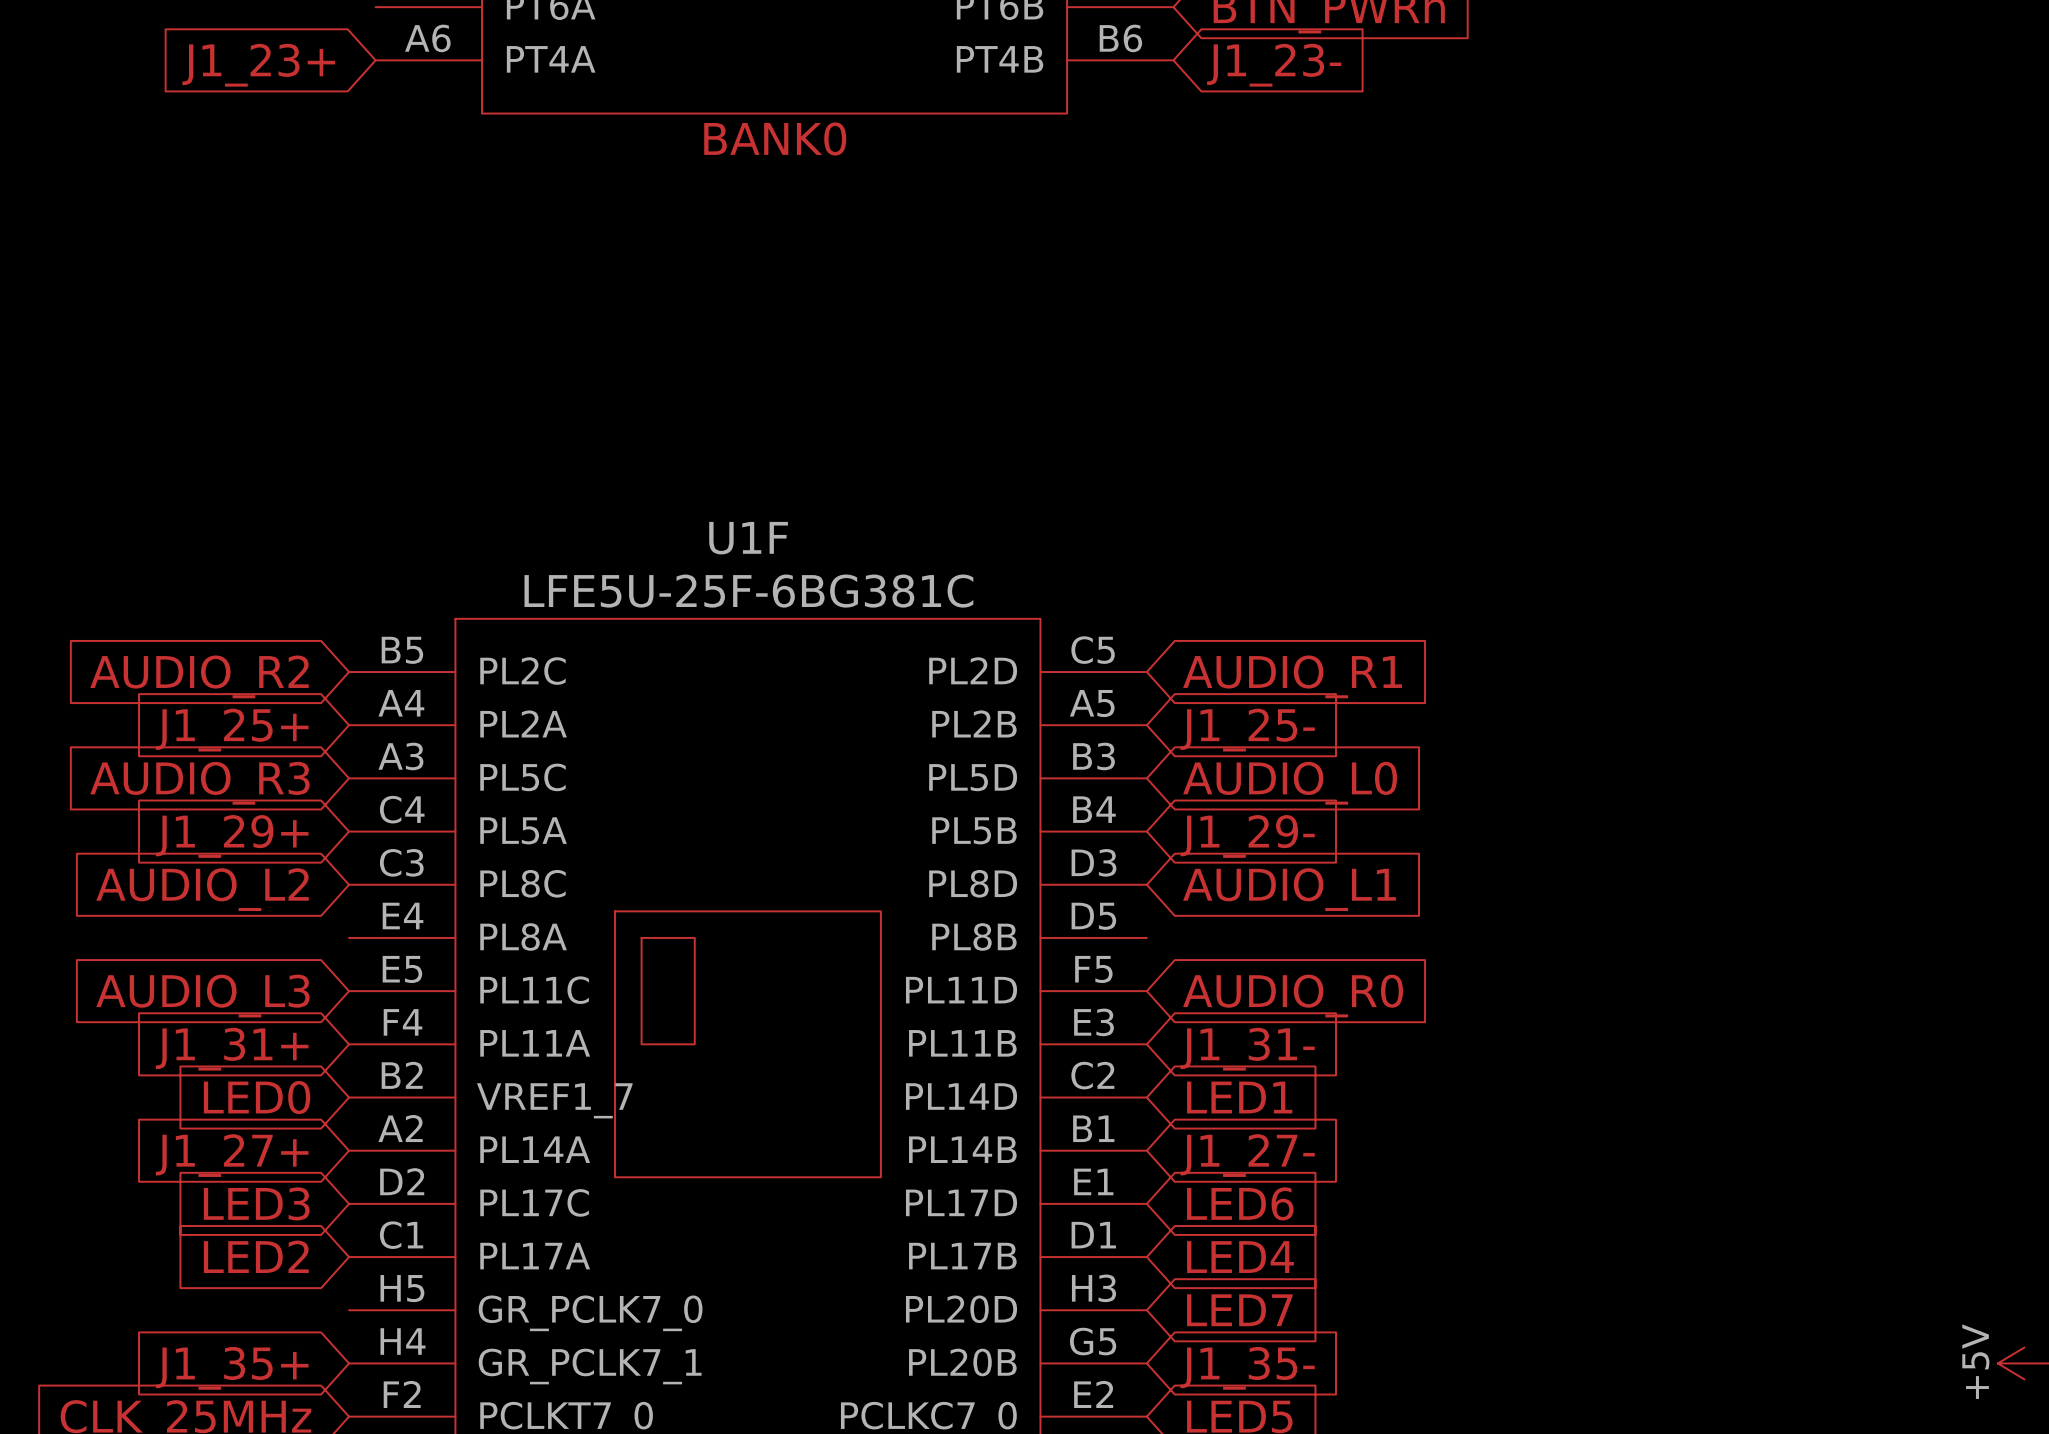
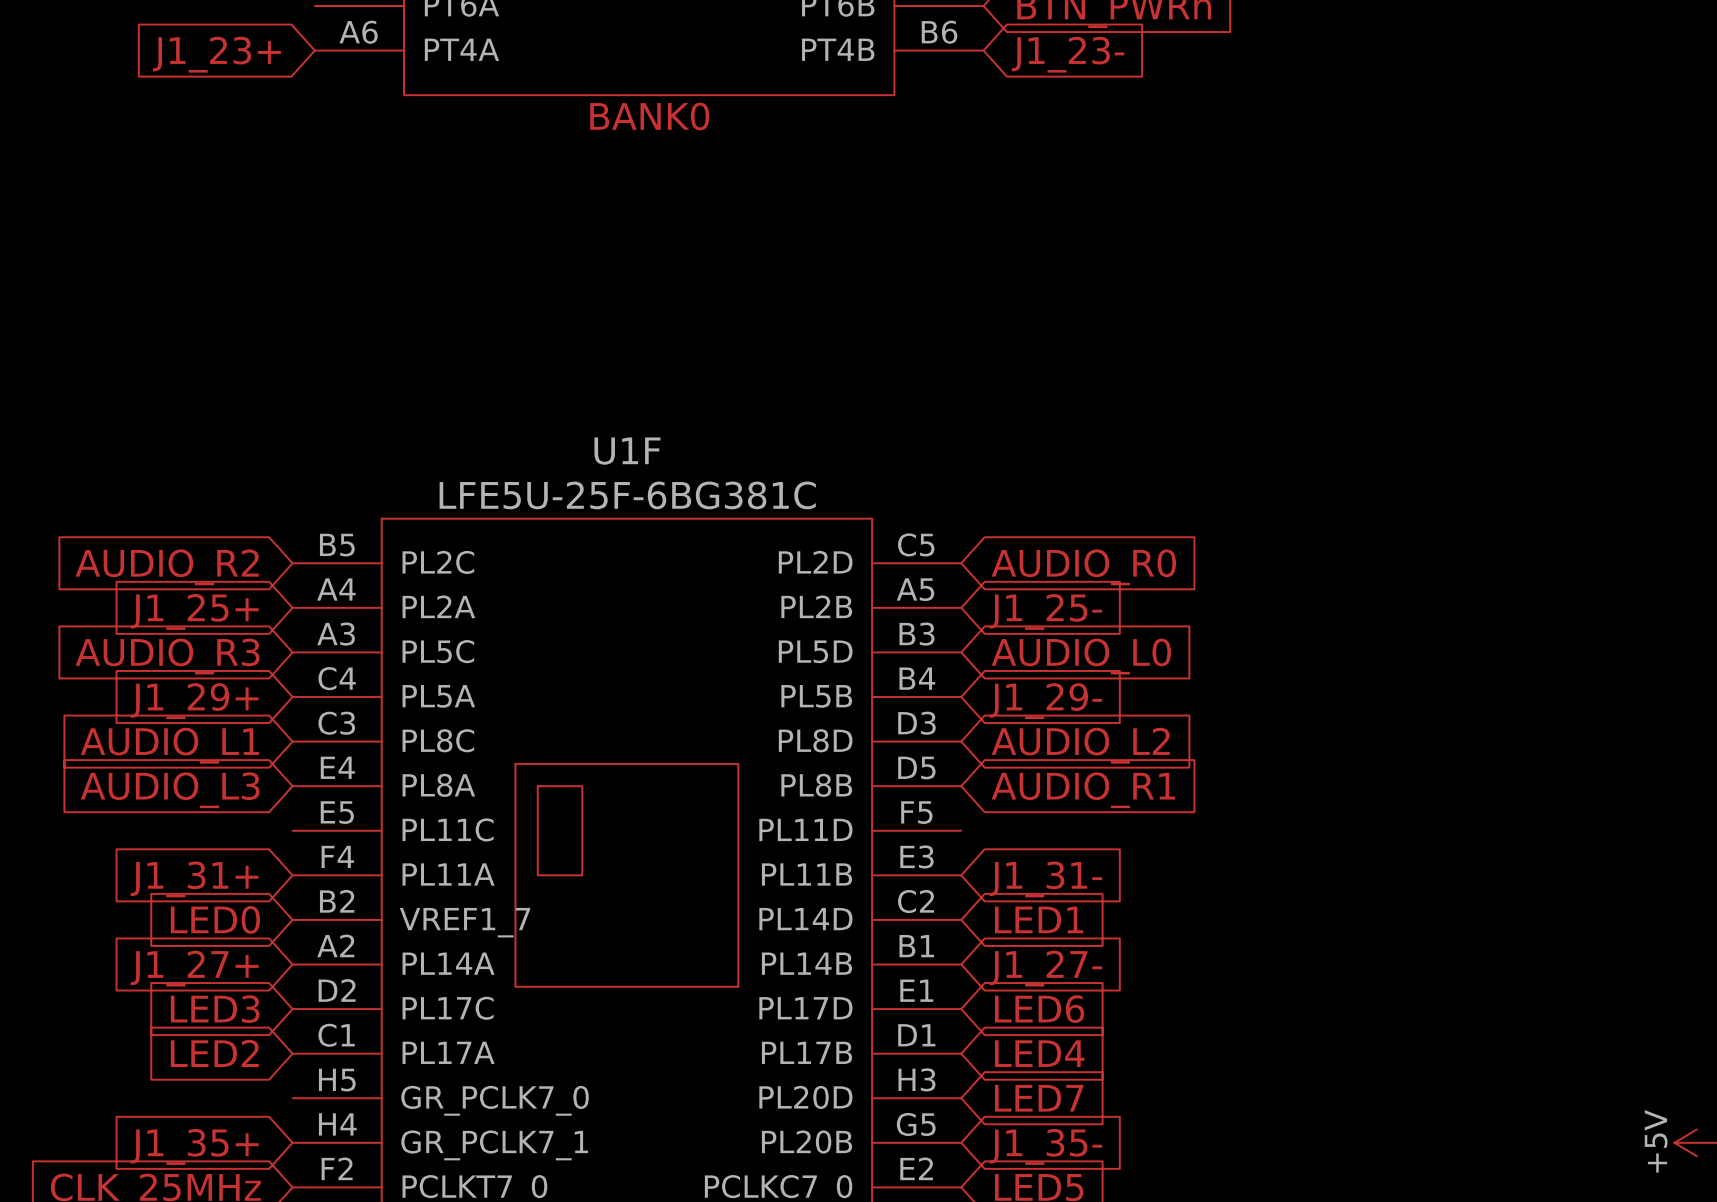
global label: AUDIO_R1 (1292, 676) -> AUDIO_R0 (1083, 567)
global label: AUDIO_L2 (202, 889) -> AUDIO_L1 (169, 745)
global label: AUDIO_L1 (1289, 889) -> AUDIO_L2 (1080, 745)
global label position: AUDIO_L3 (202, 996) -> AUDIO_L3 (170, 790)
global label: AUDIO_R0 (1293, 996) -> AUDIO_R1 (1083, 790)

